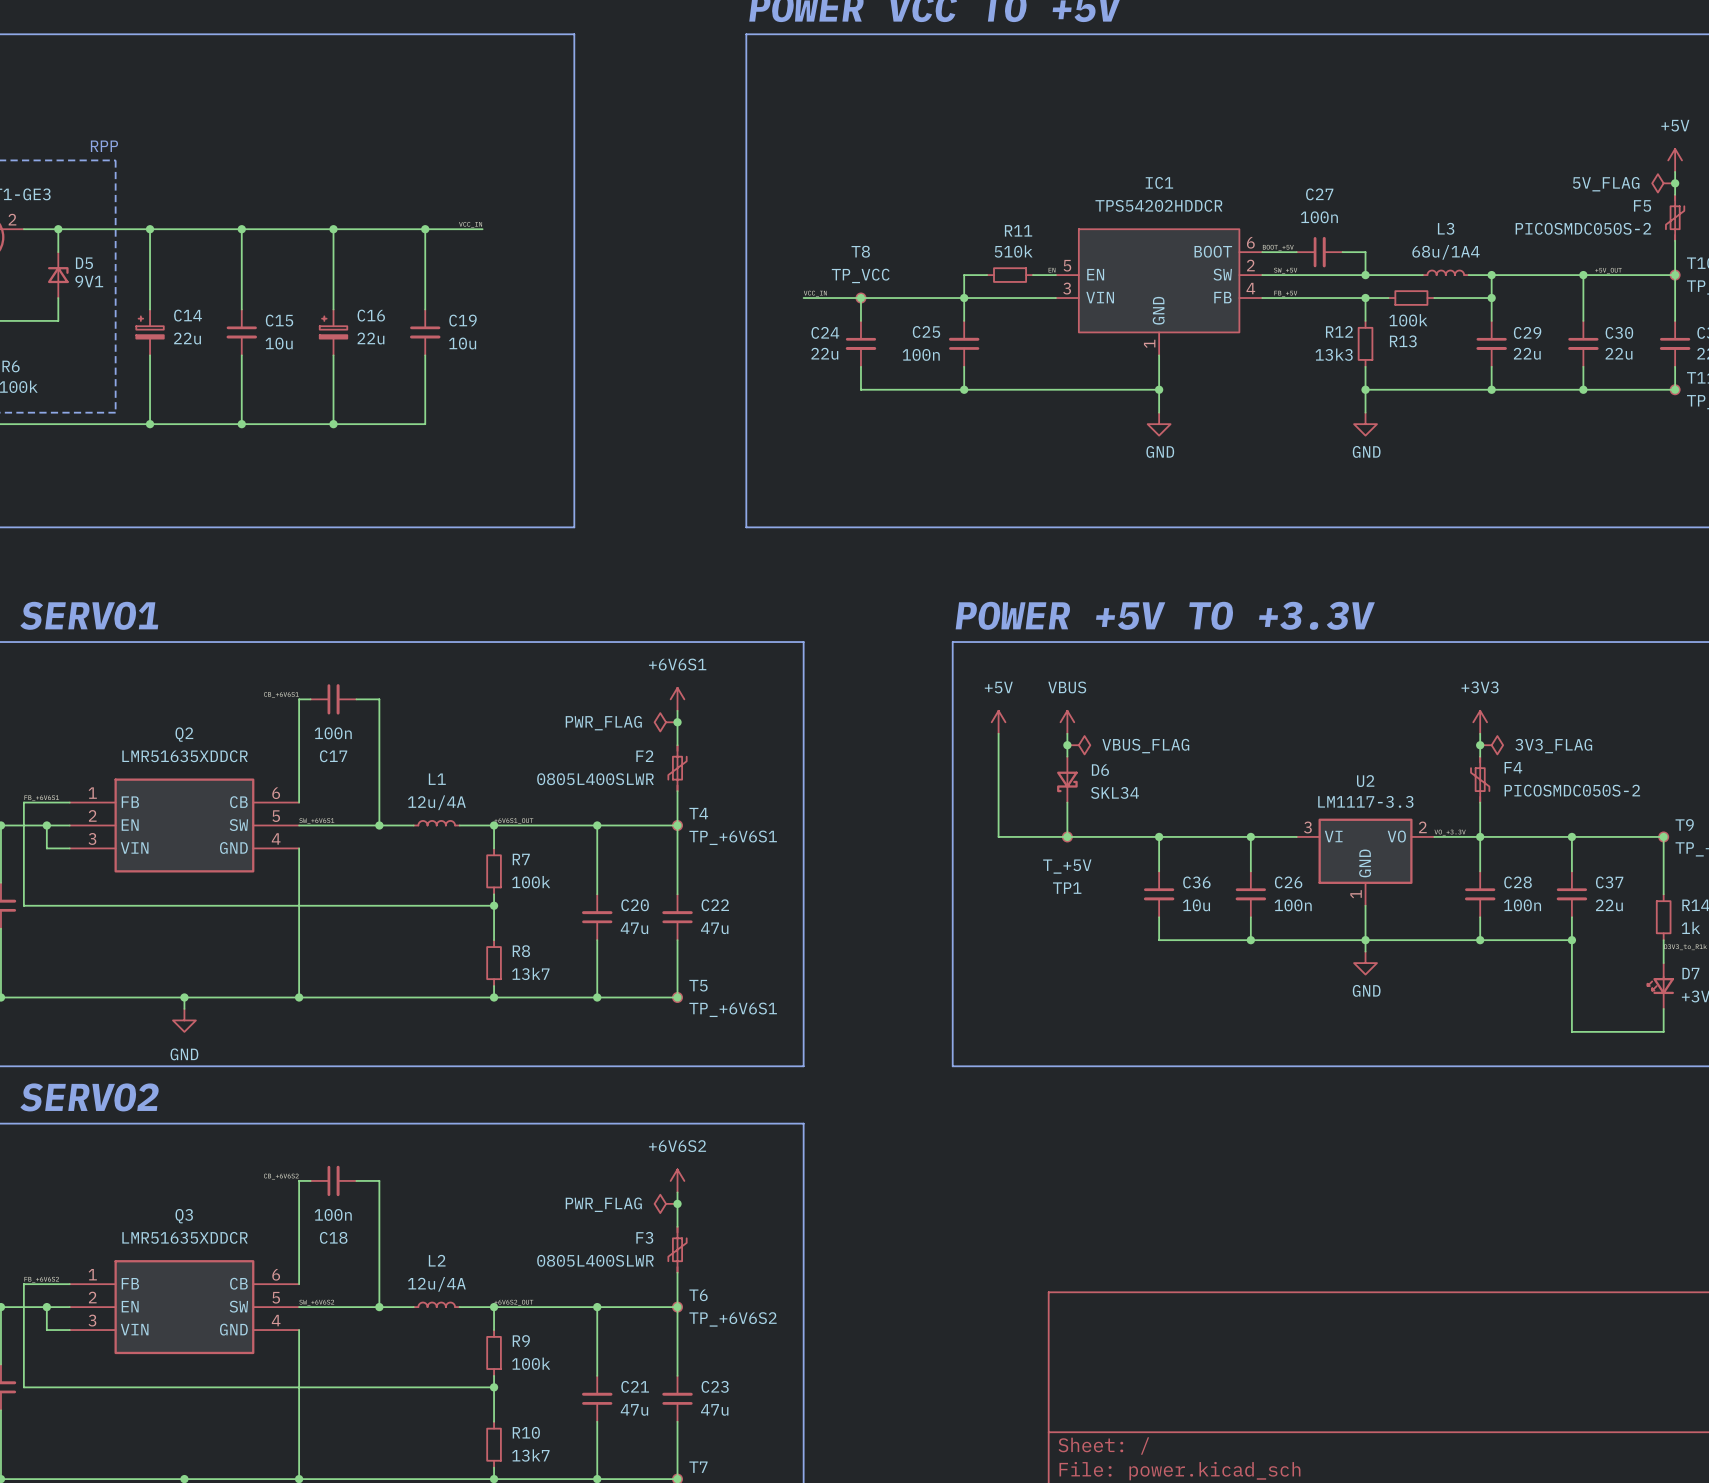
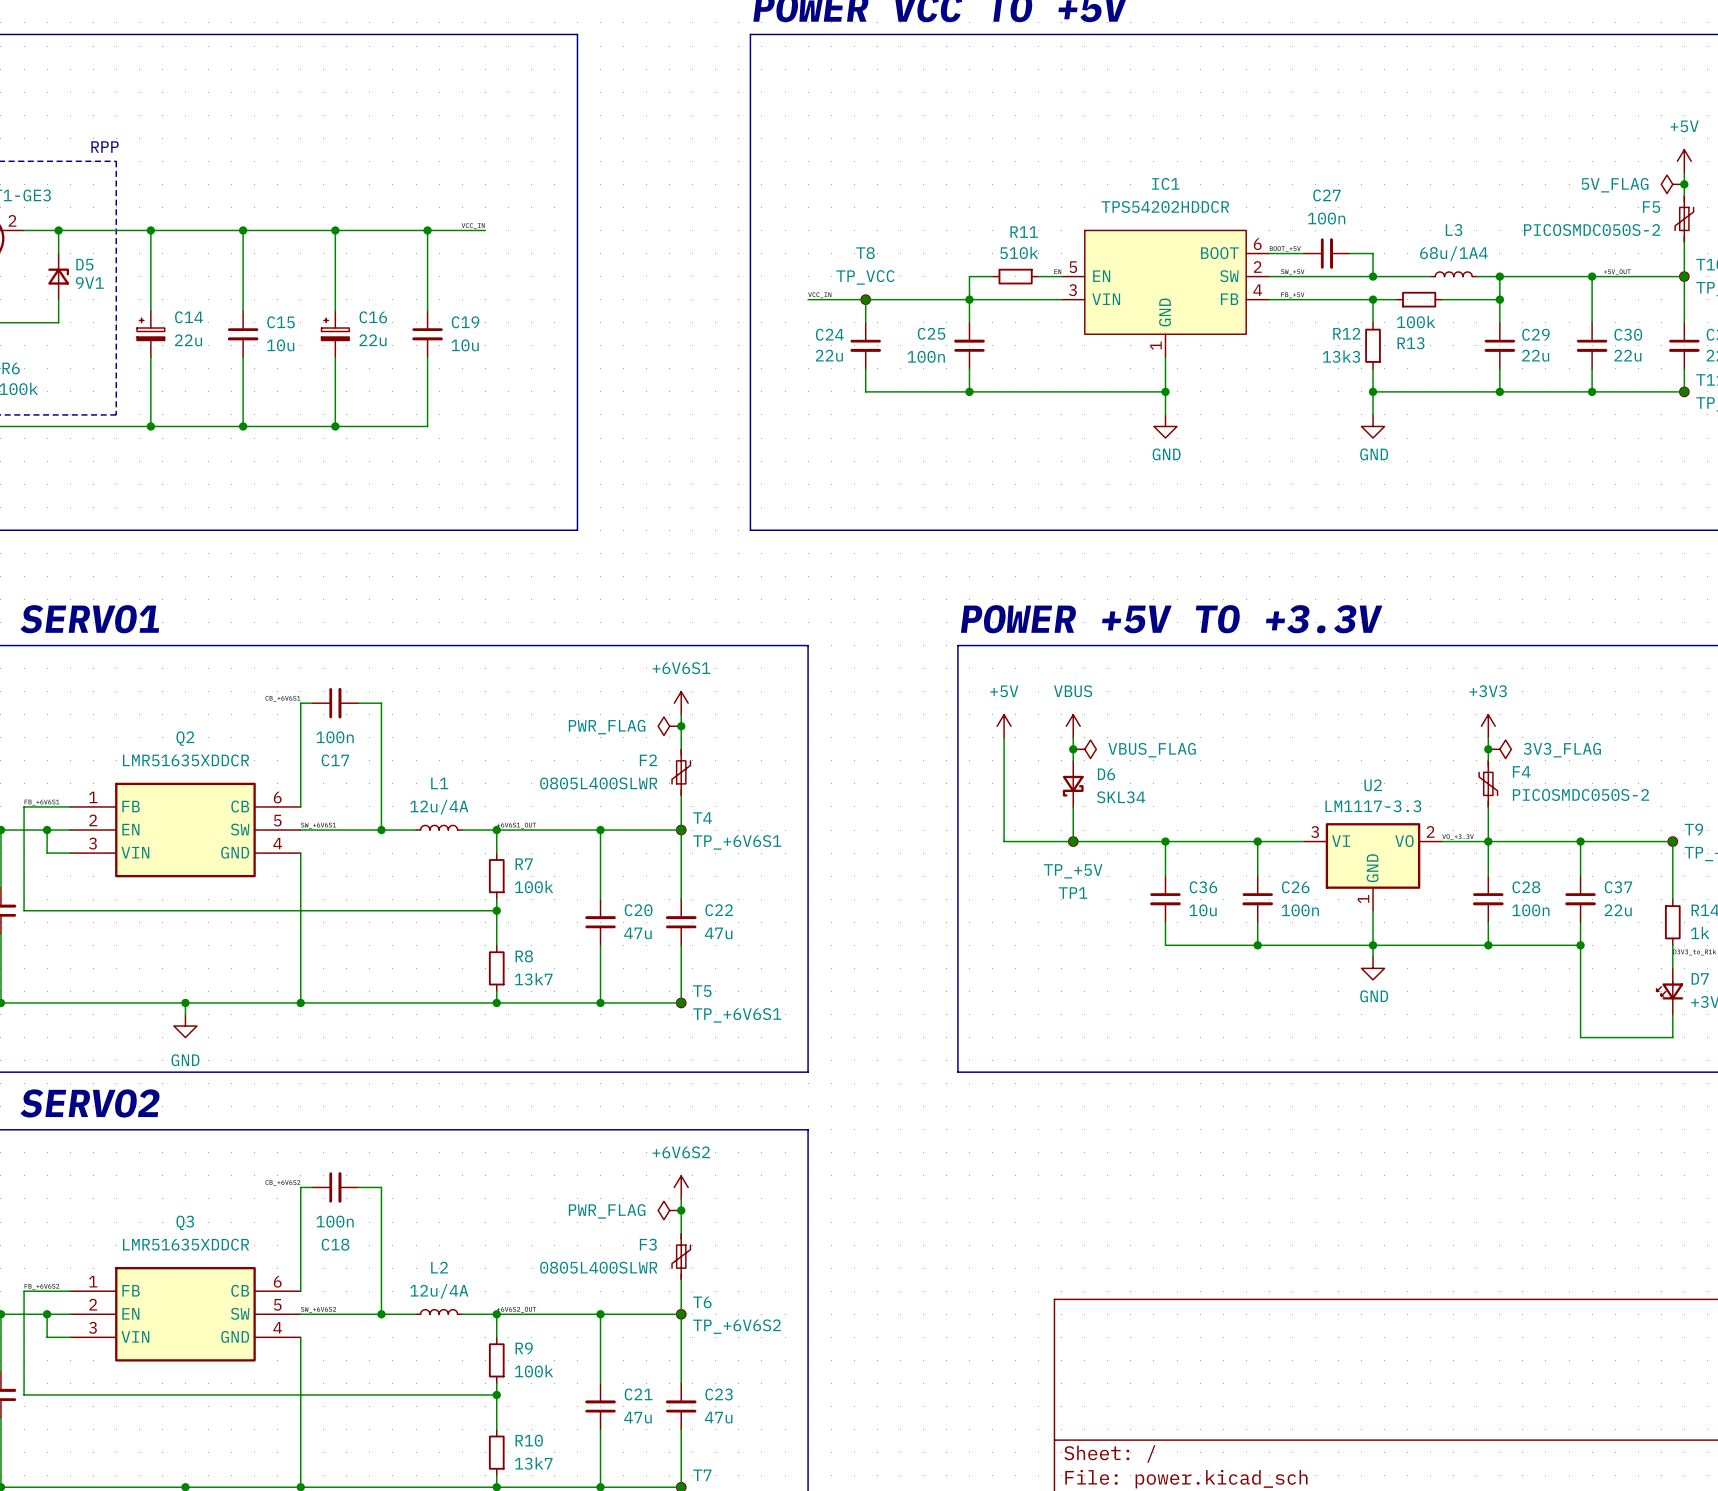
TP1 value: T_+5V (1067, 866) -> TP_+5V (1073, 871)

